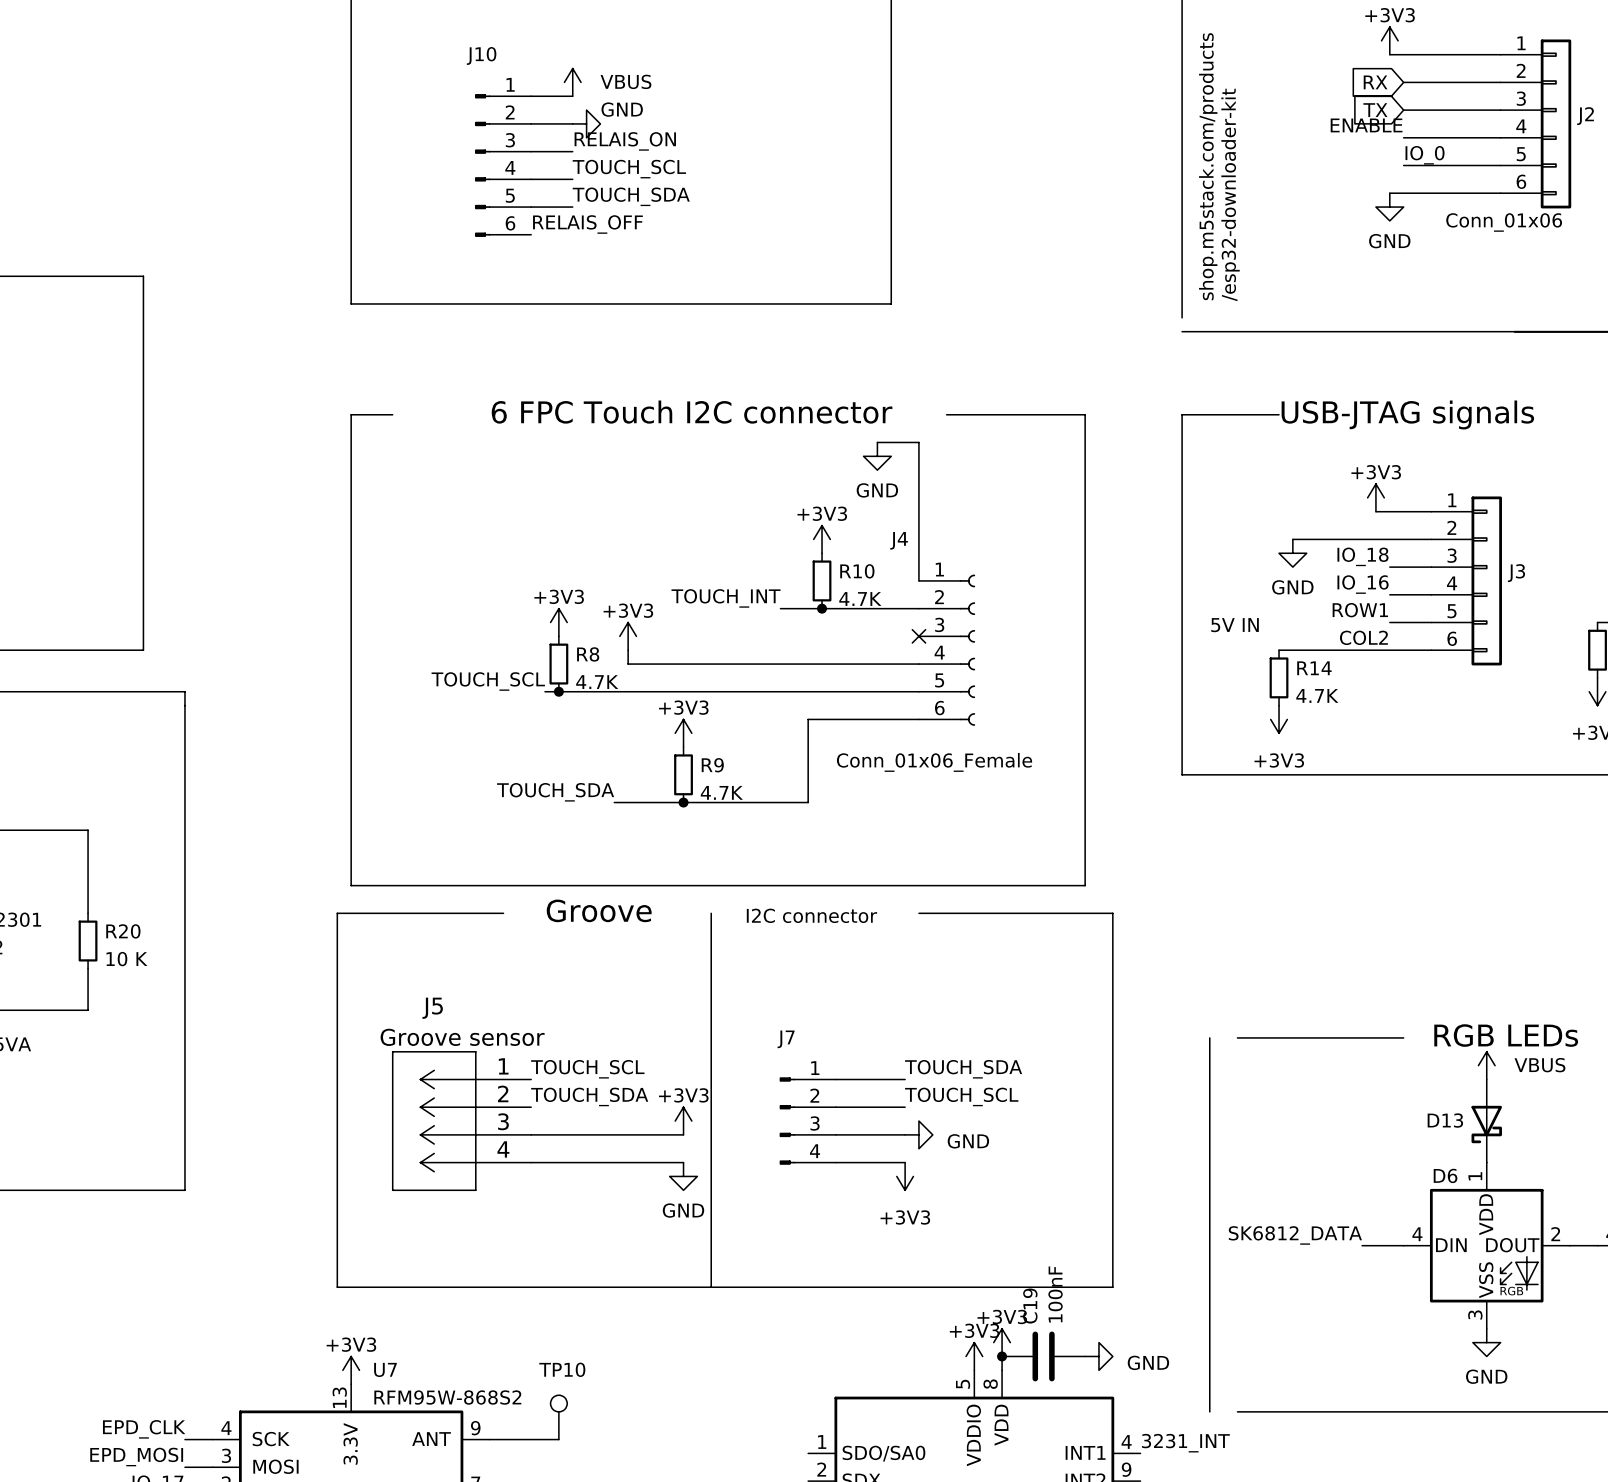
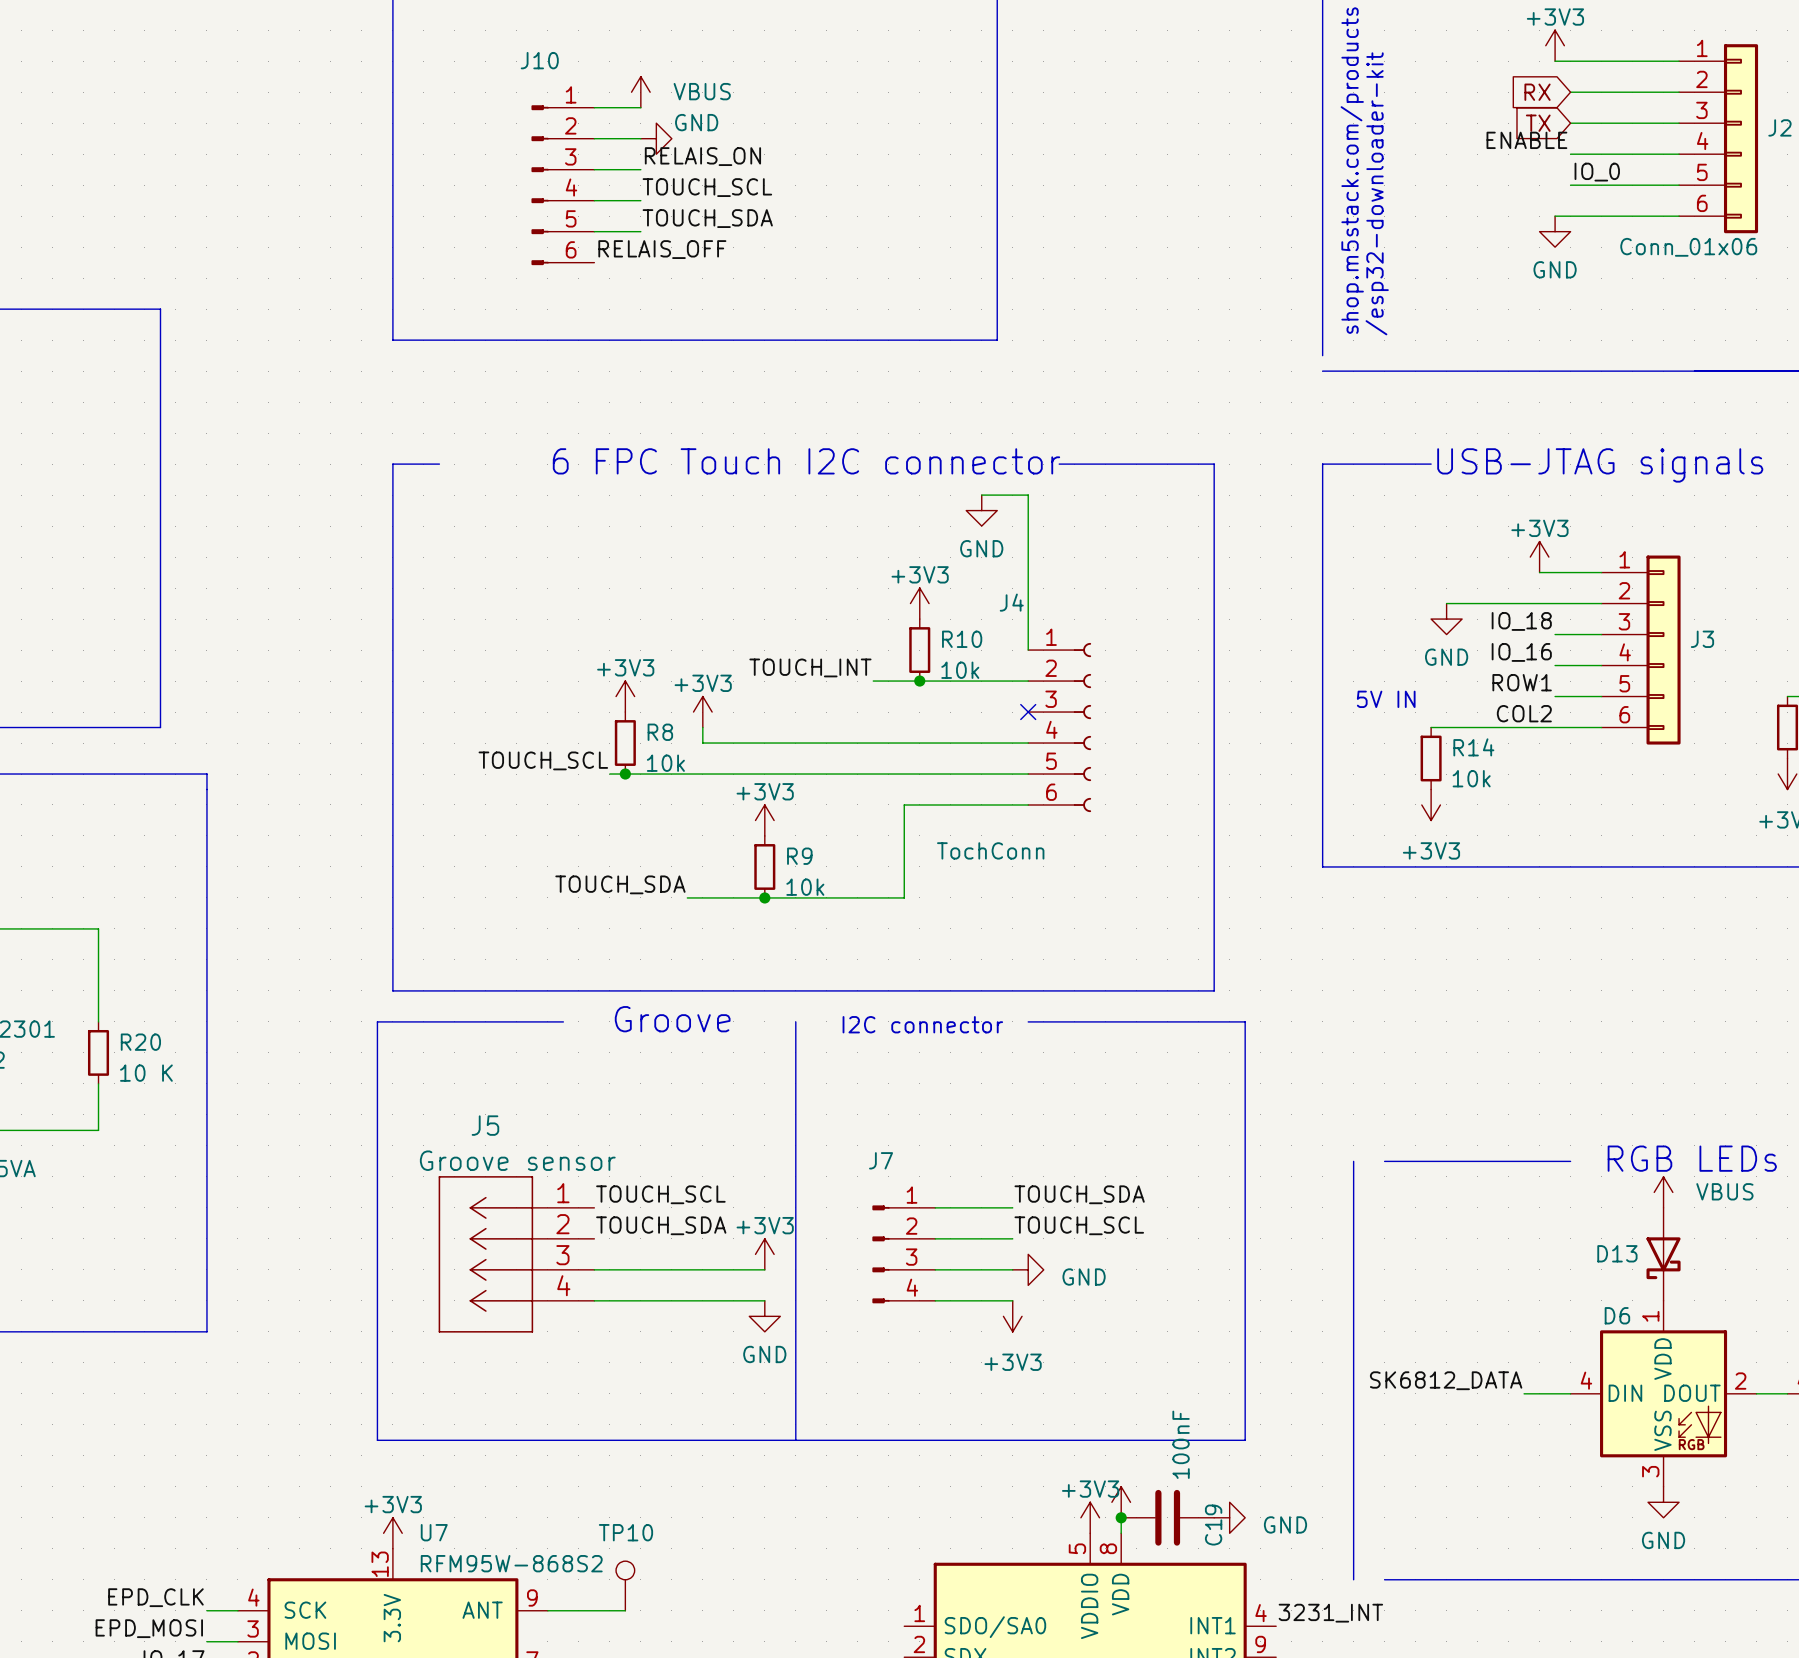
R10 value: 4.7K (860, 599) -> 10k (960, 670)
R8 value: 4.7K (597, 682) -> 10k (665, 763)
R14 value: 4.7K (1317, 695) -> 10k (1471, 778)
J4 value: Conn_01x06_Female (934, 762) -> TochConn (990, 850)
R9 value: 4.7K (721, 792) -> 10k (805, 887)
C19 name position: C19 (1030, 1306) -> C19 (1213, 1525)
power symbol text: +3V3 (1002, 1316) -> none

